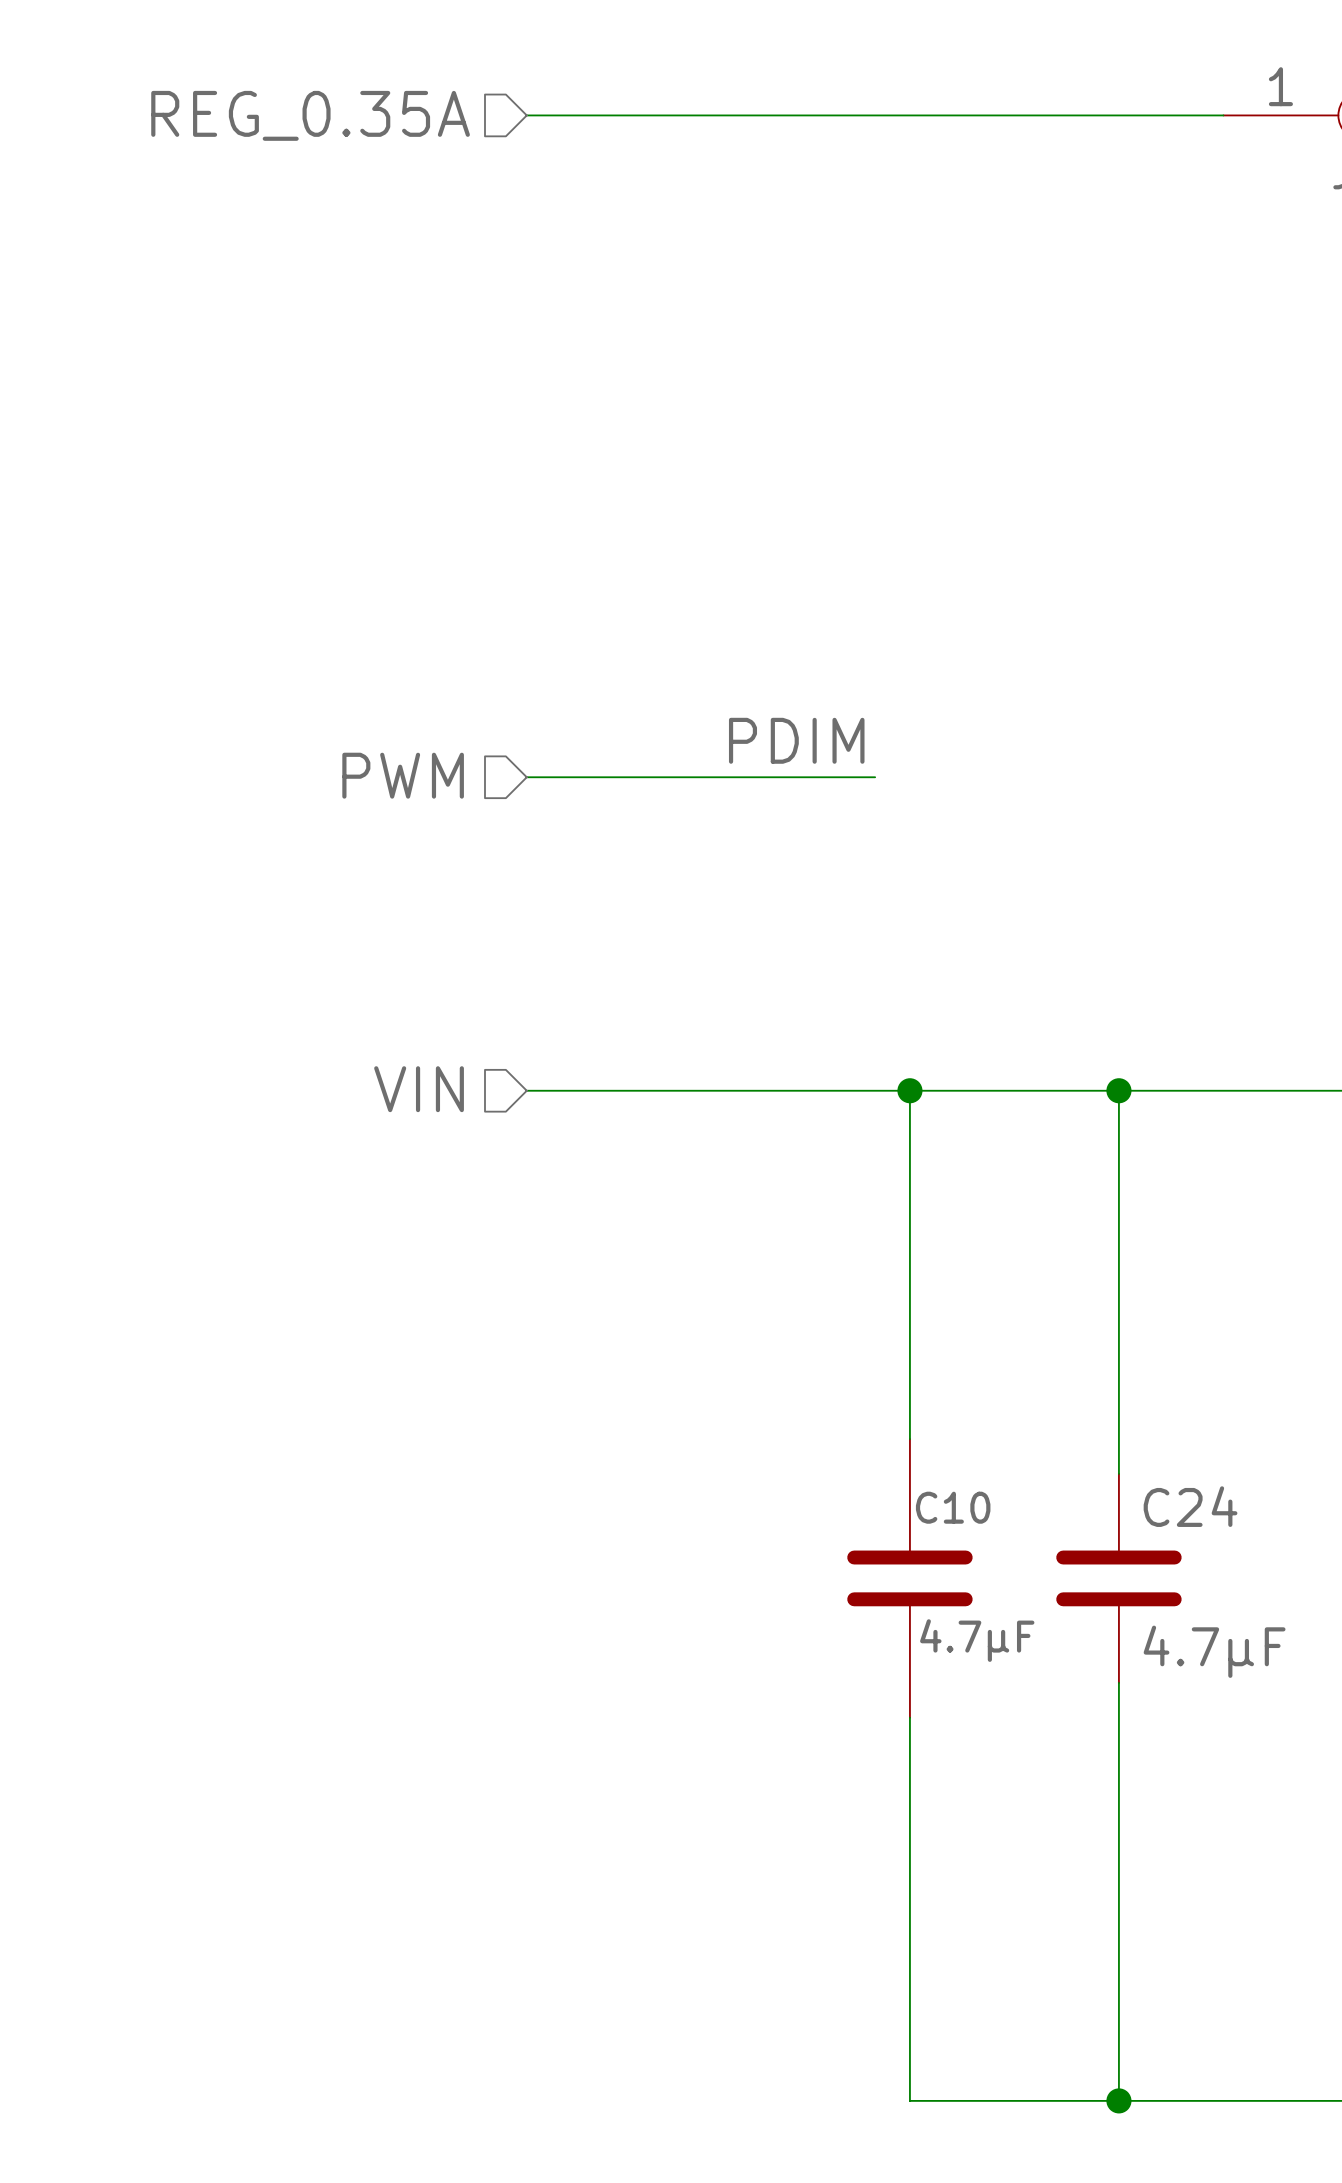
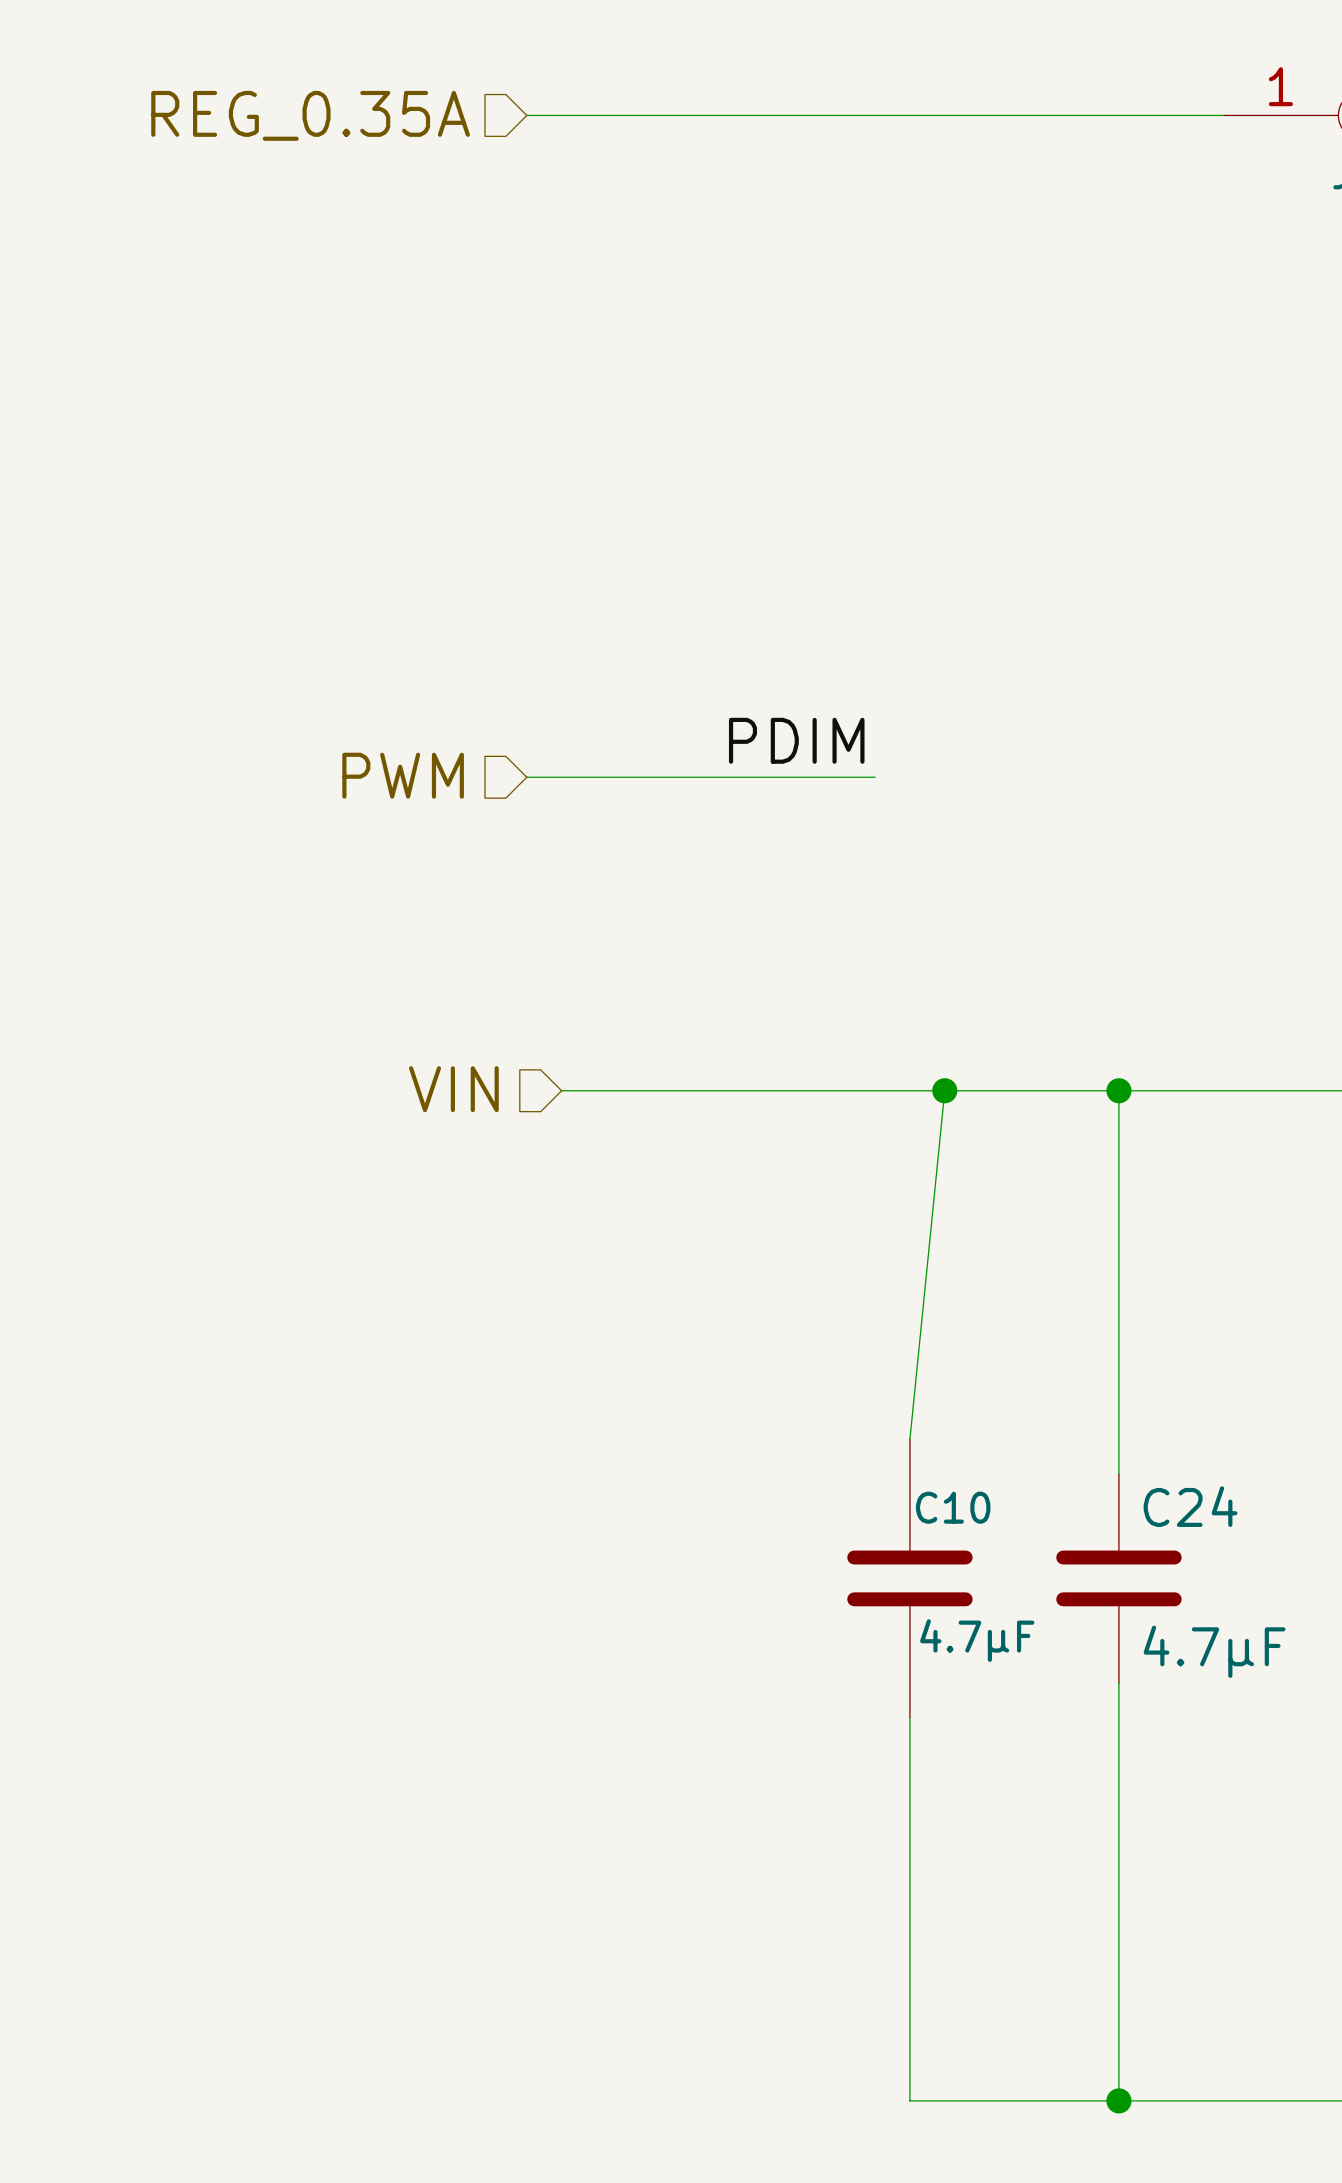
hierarchical label position: VIN (419, 1089) -> VIN (453, 1089)
wire: (526, 1090) (561, 1090) -> none
wire: (909, 1090) (909, 1439) -> (944, 1090) (909, 1439)
junction position: (909, 1090) -> (944, 1090)

